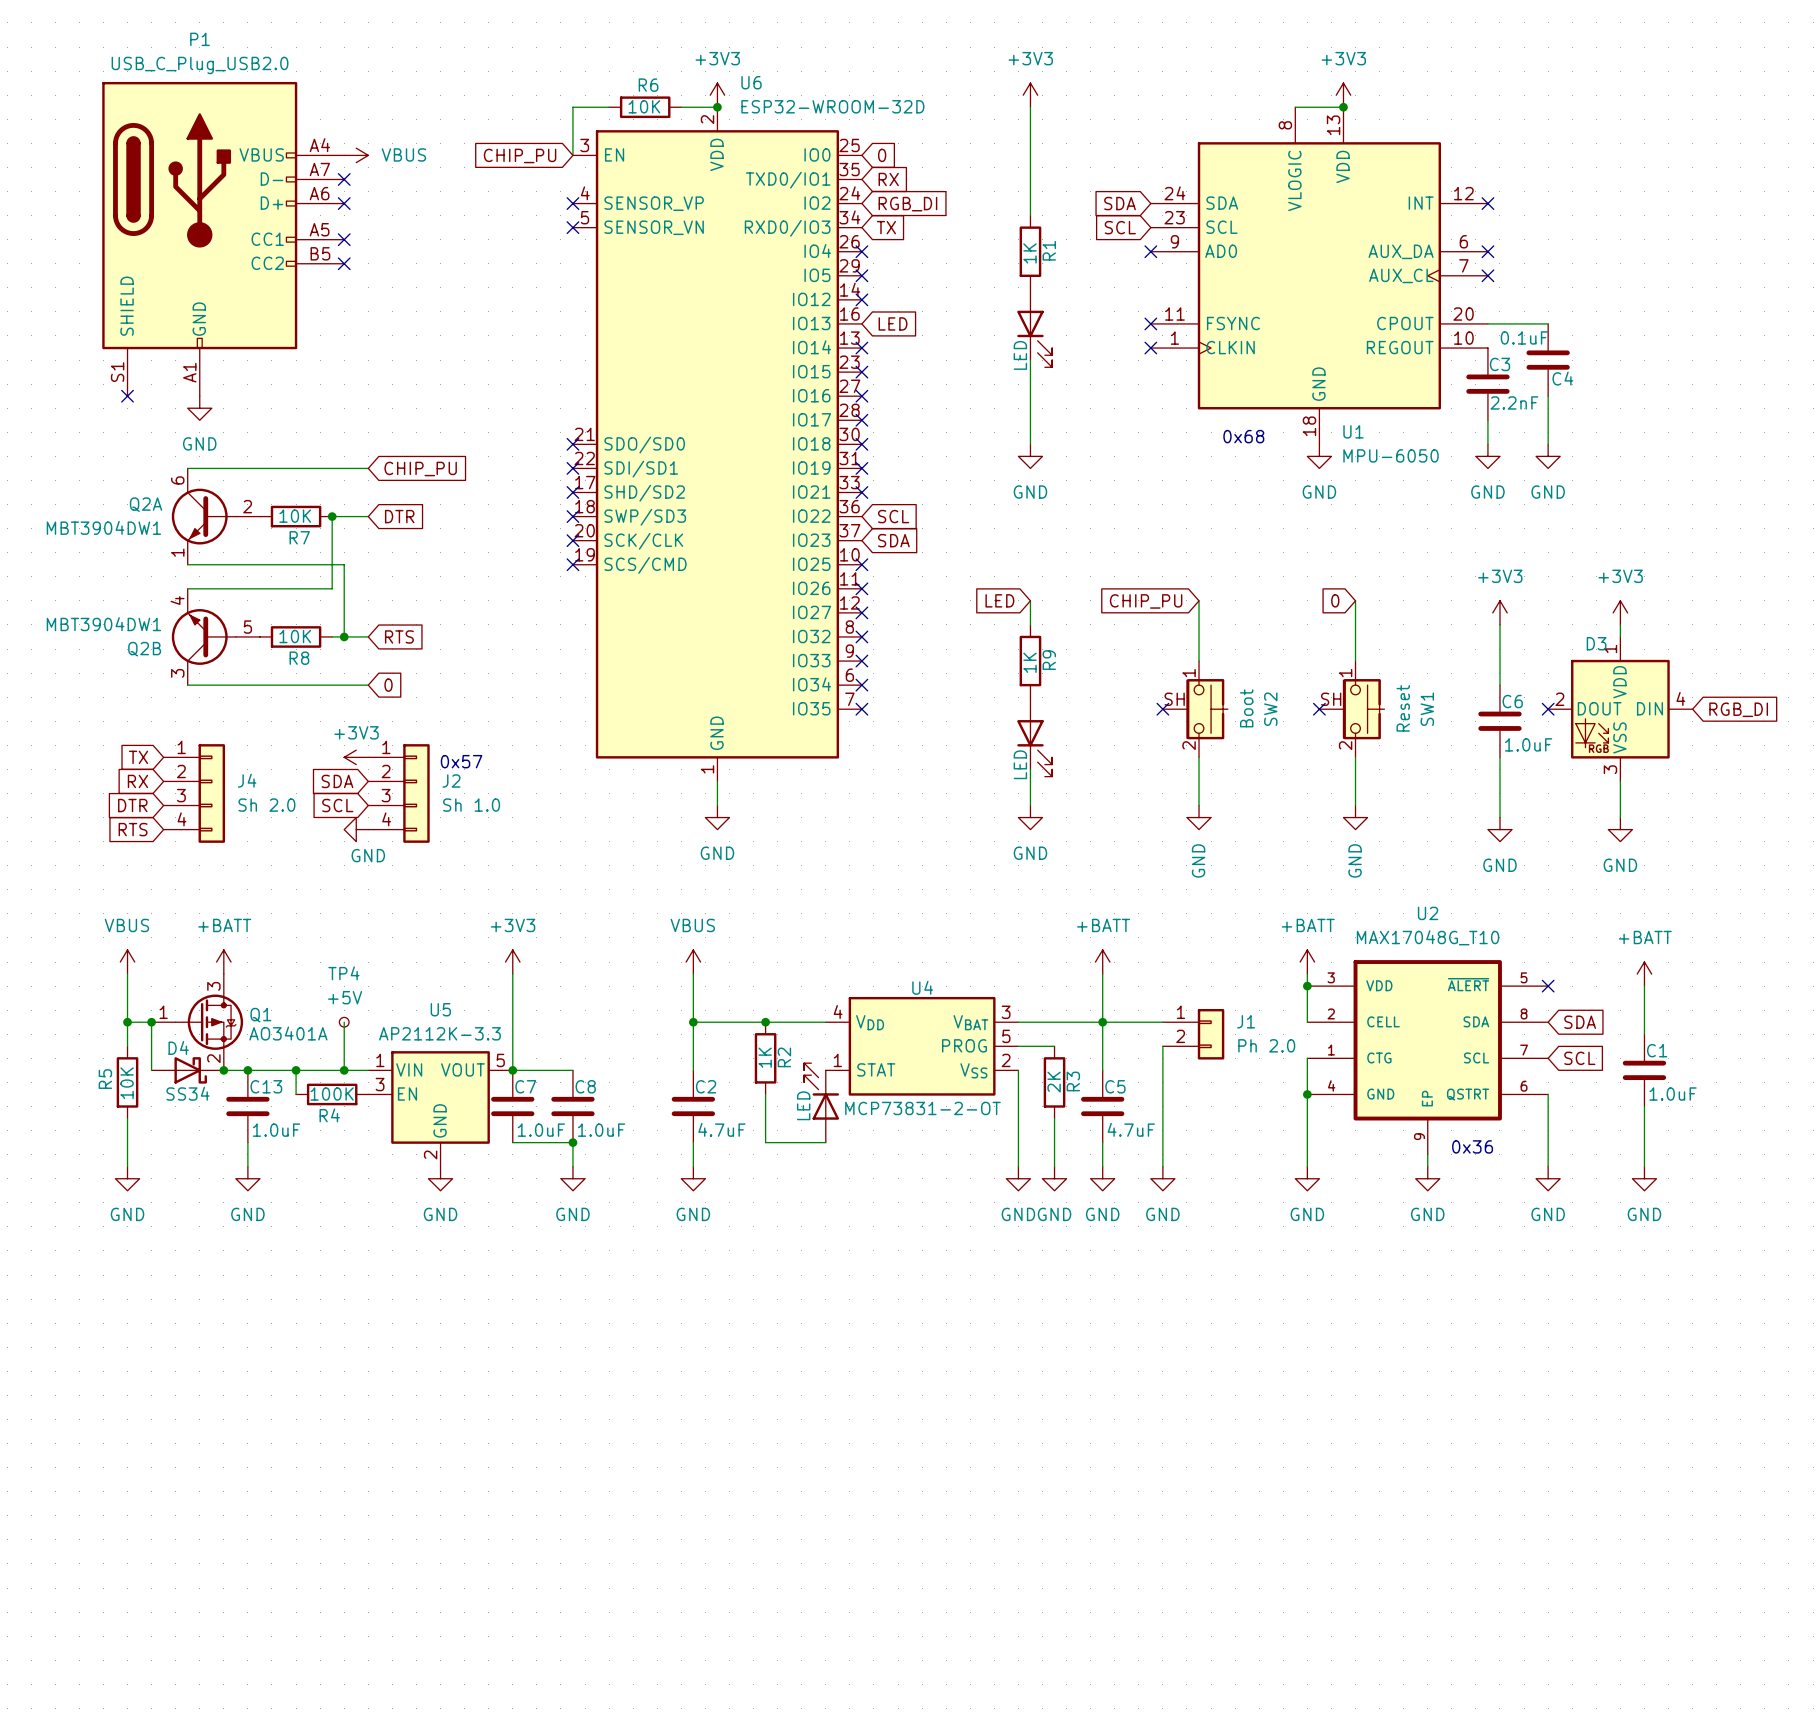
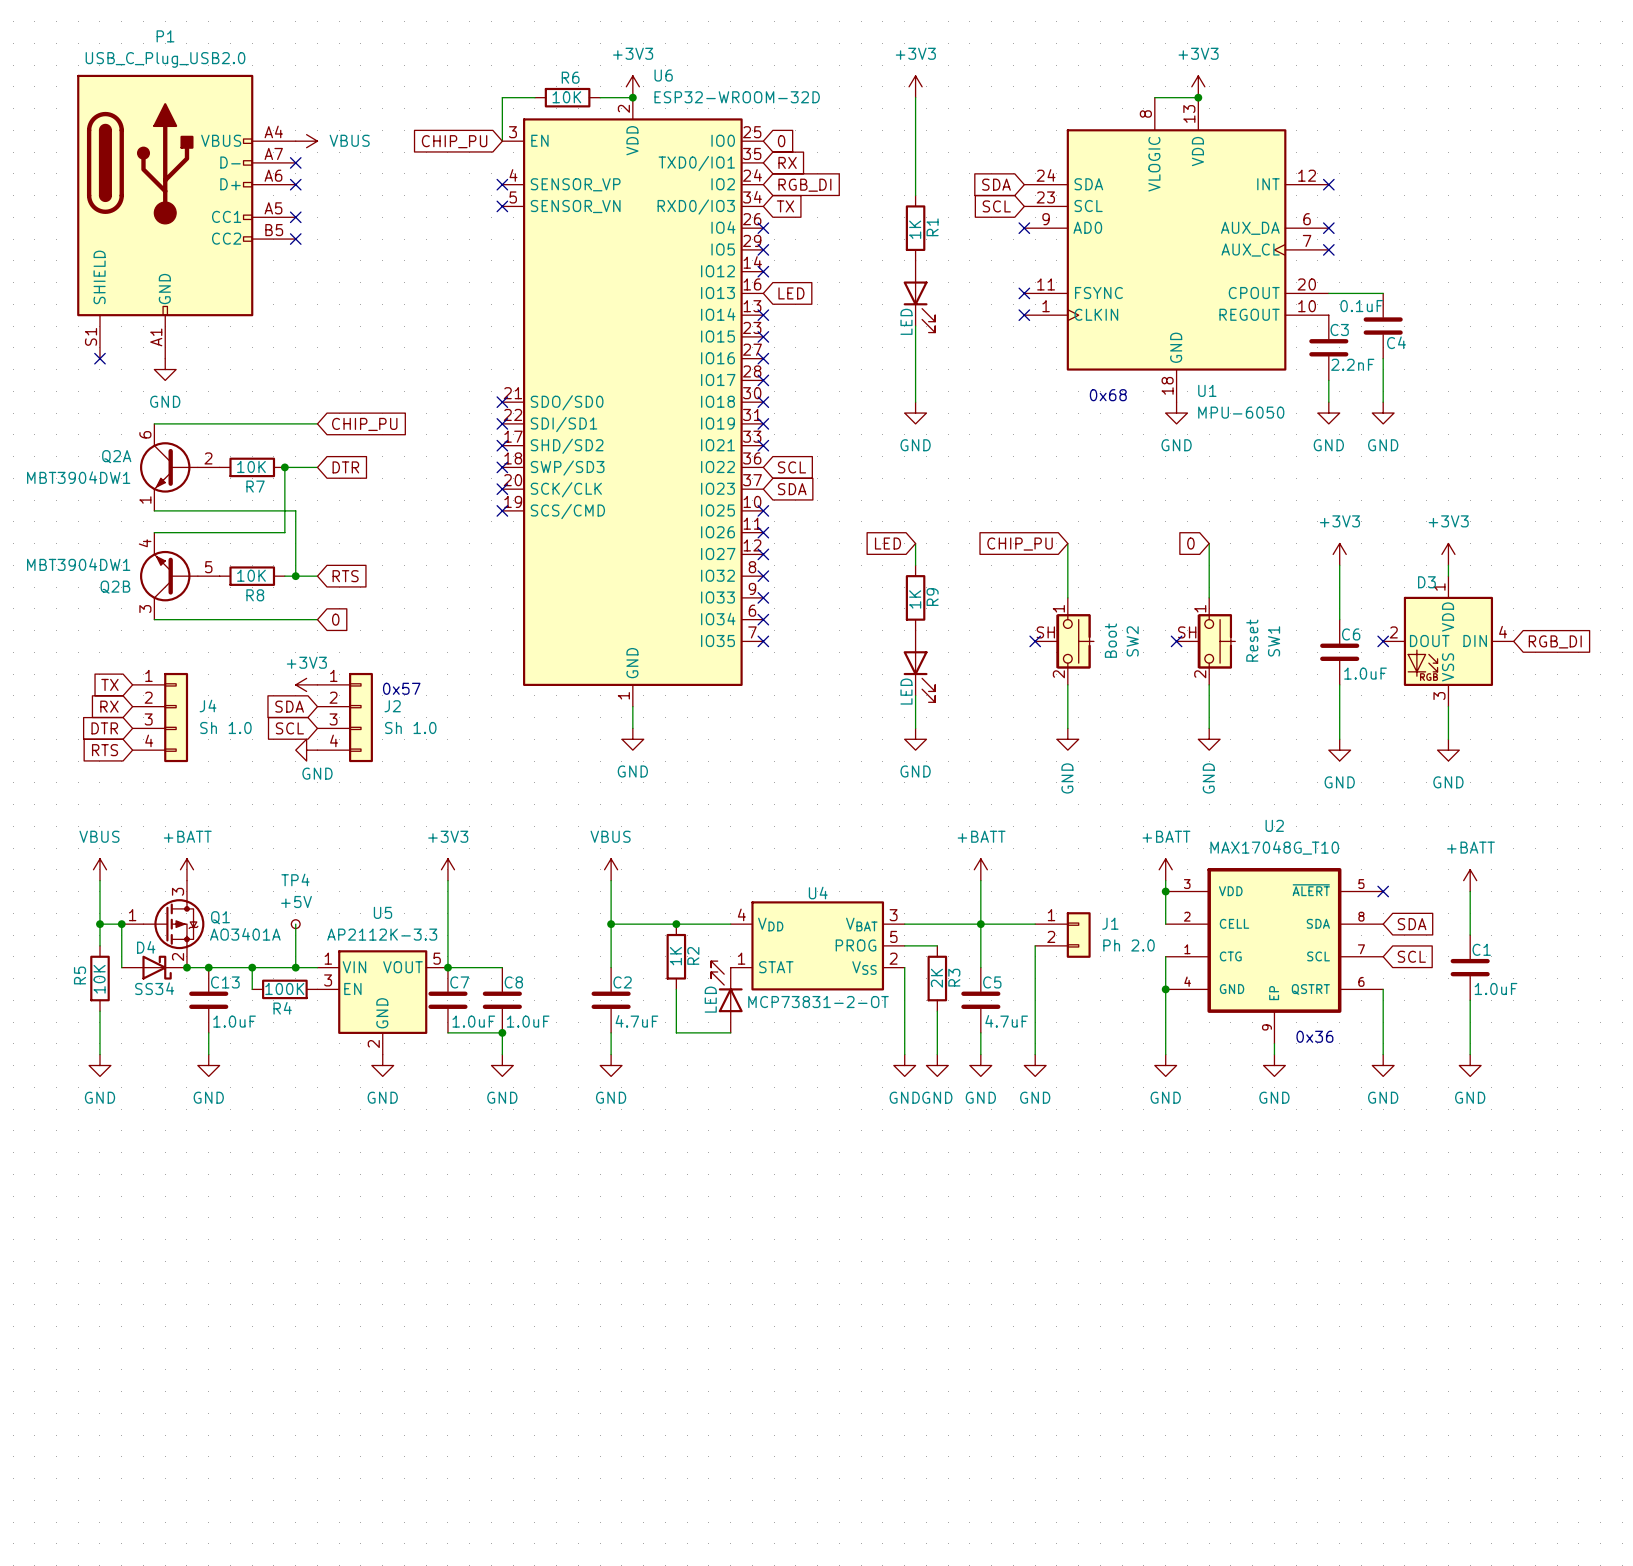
J4 value: Sh 2.0 (266, 805) -> Sh 1.0 (225, 727)

